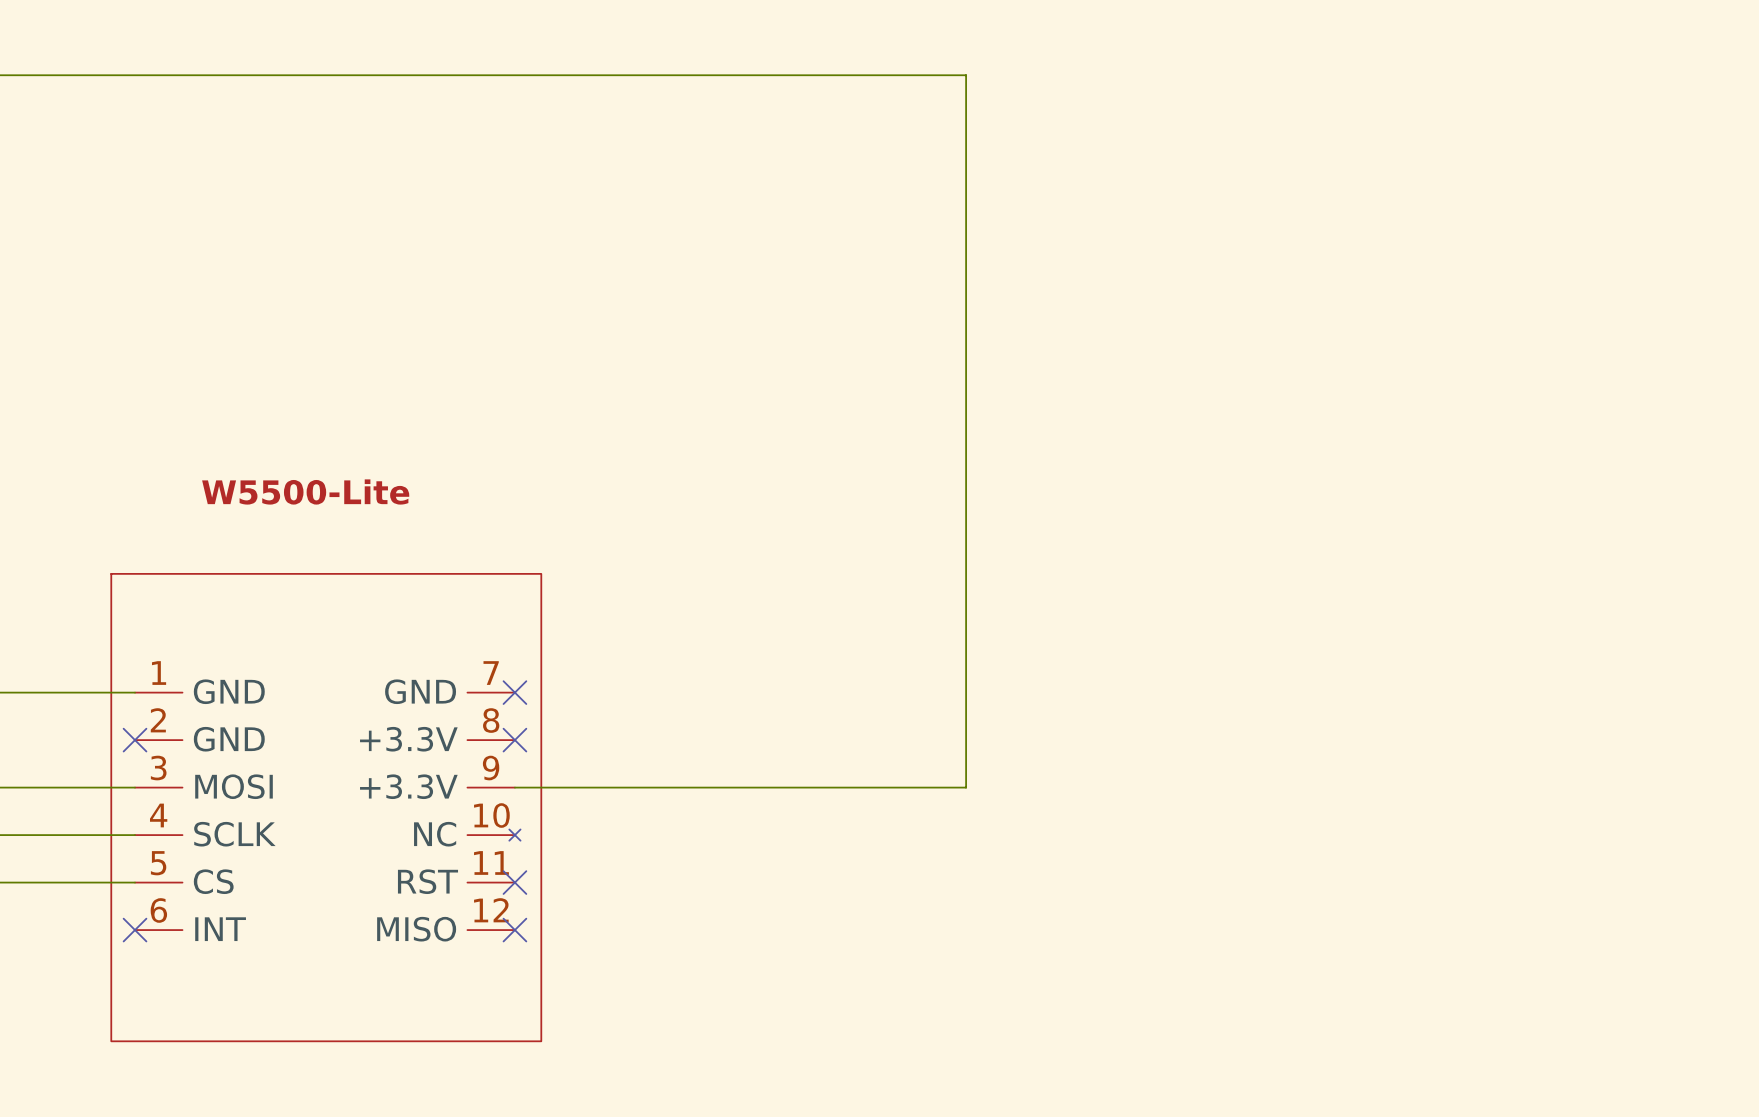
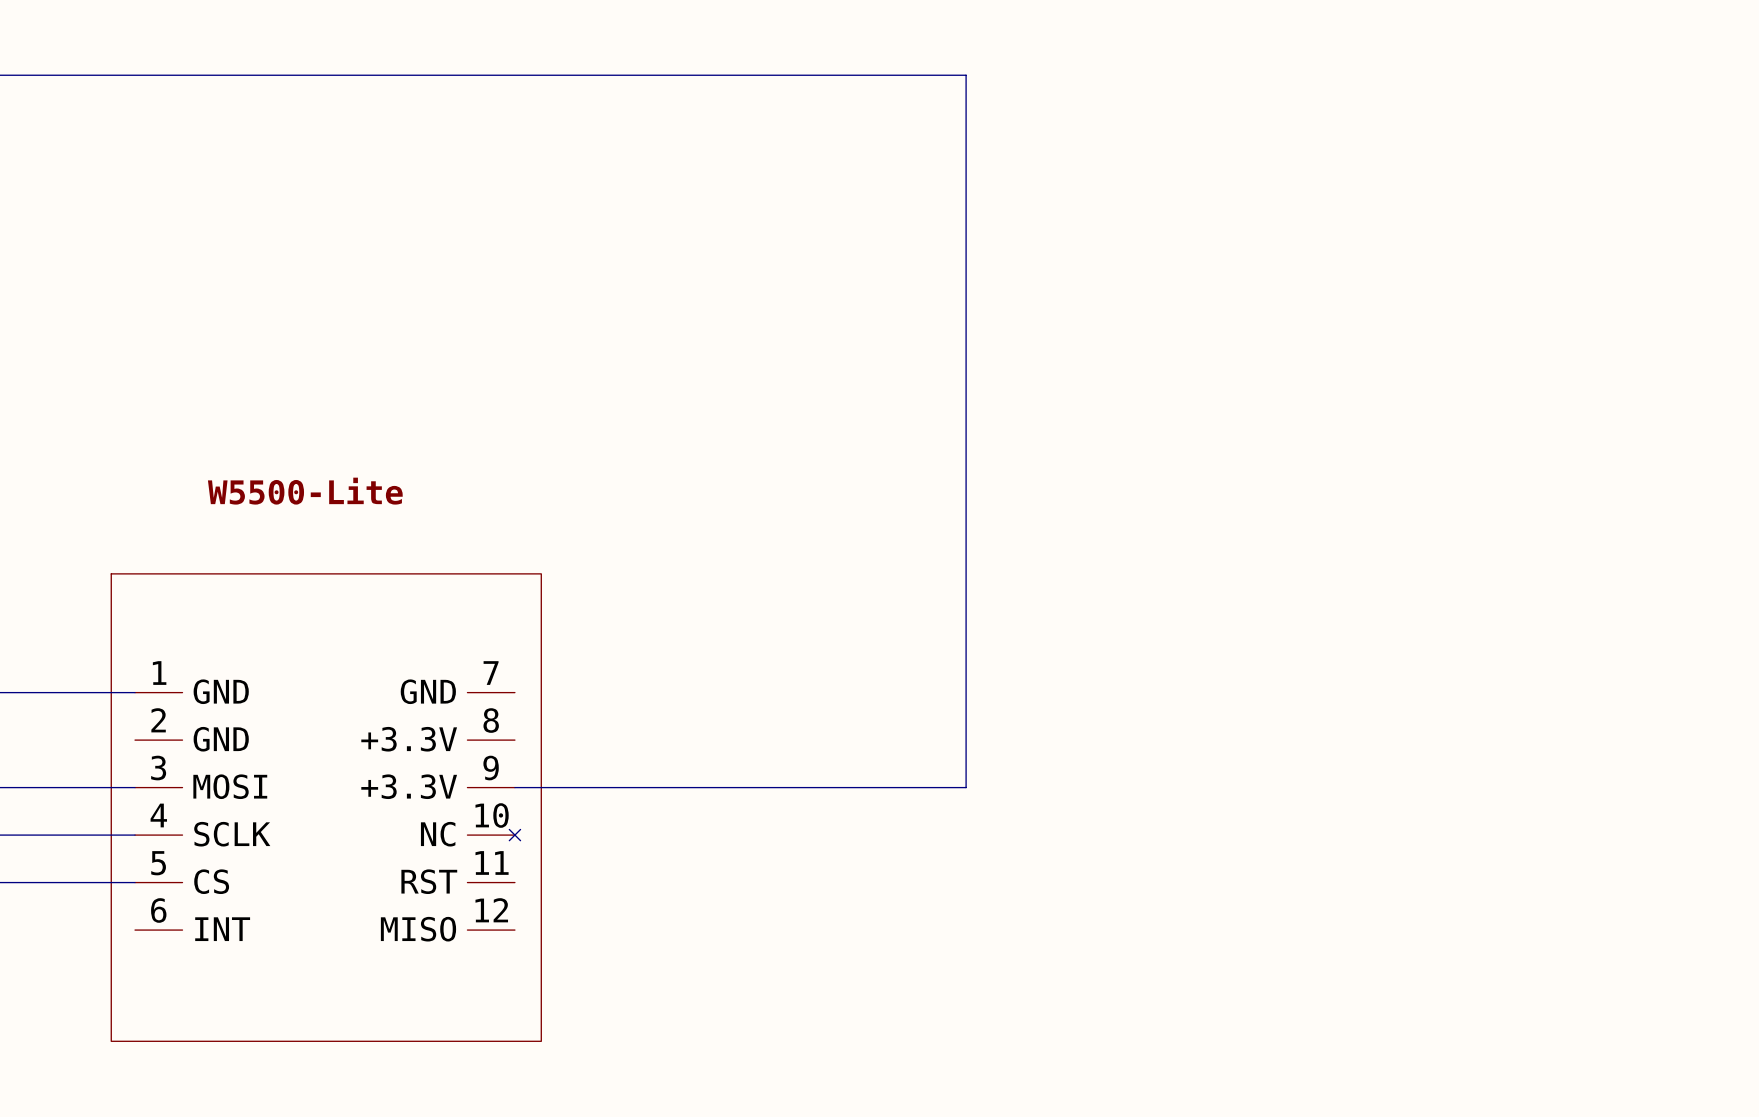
no-connect mark: (514, 692) -> none
no-connect mark: (135, 740) -> none
no-connect mark: (514, 740) -> none
no-connect mark: (514, 882) -> none
no-connect mark: (135, 930) -> none
no-connect mark: (514, 930) -> none

